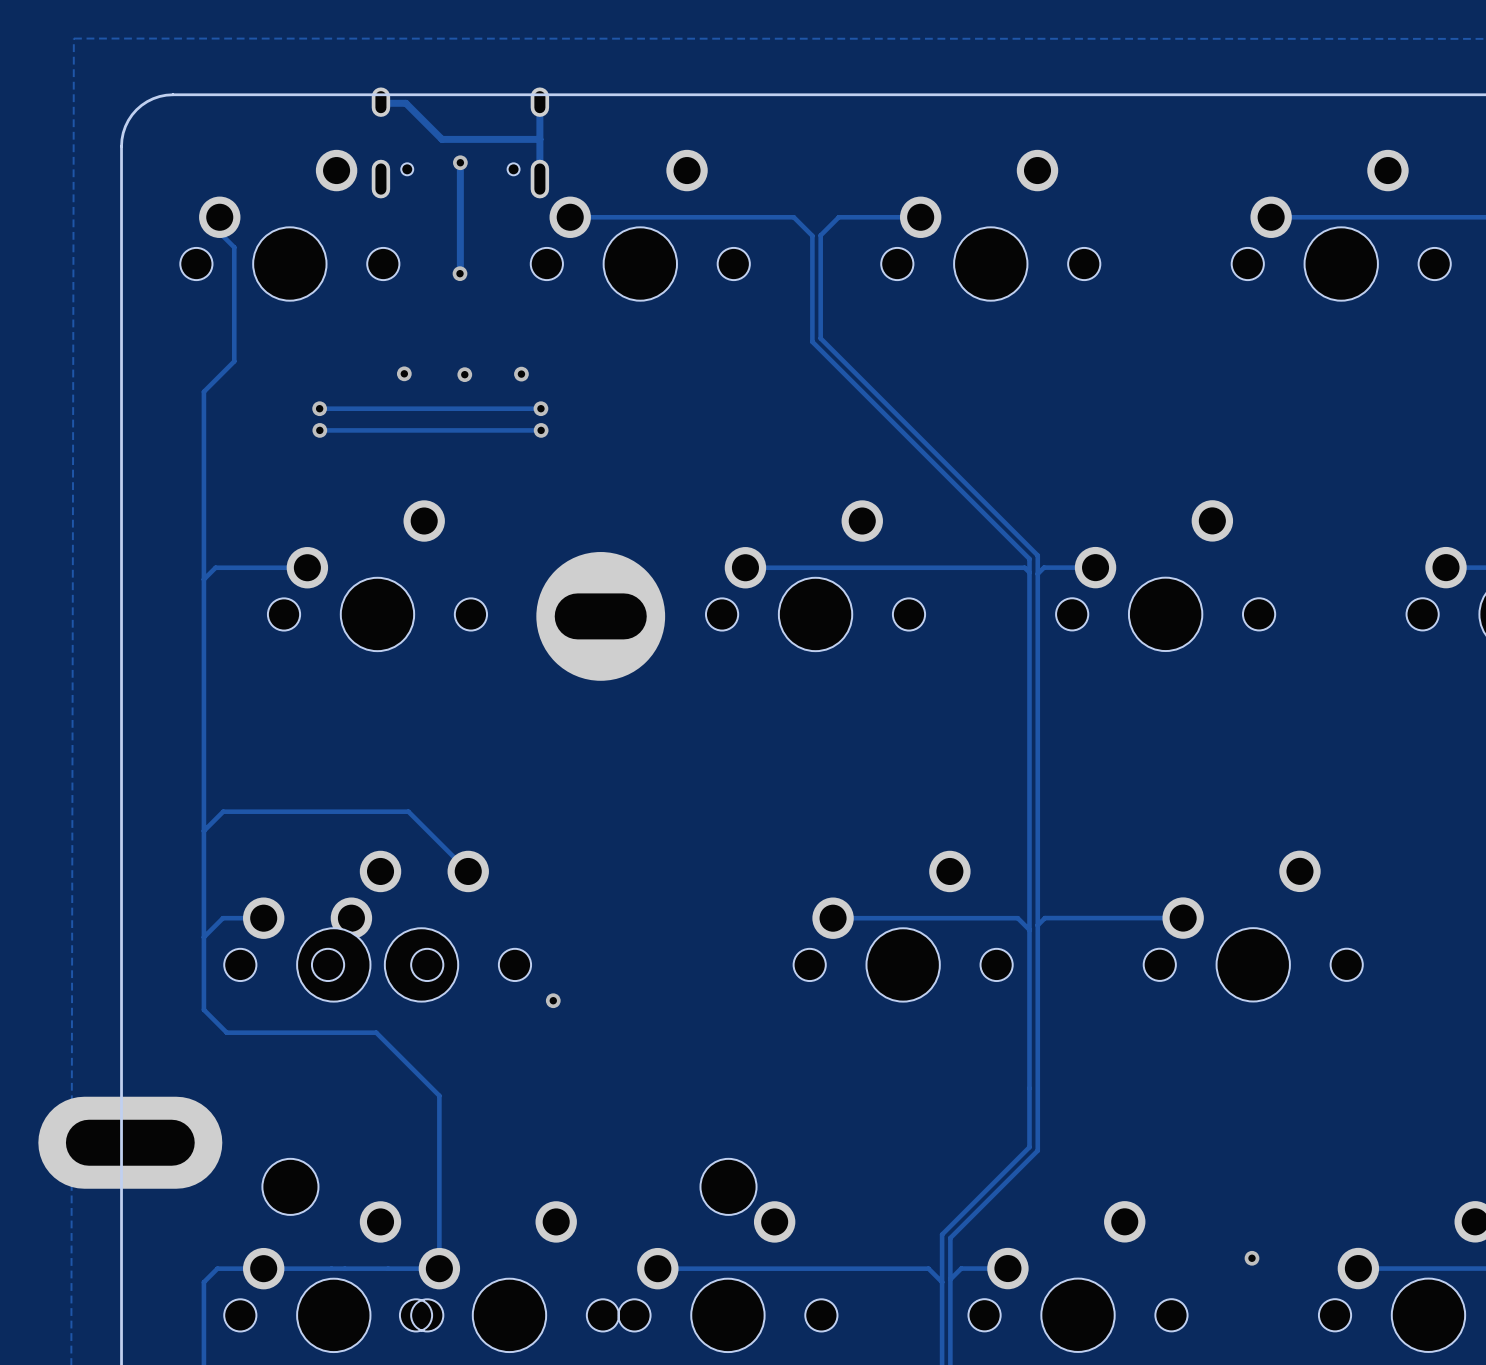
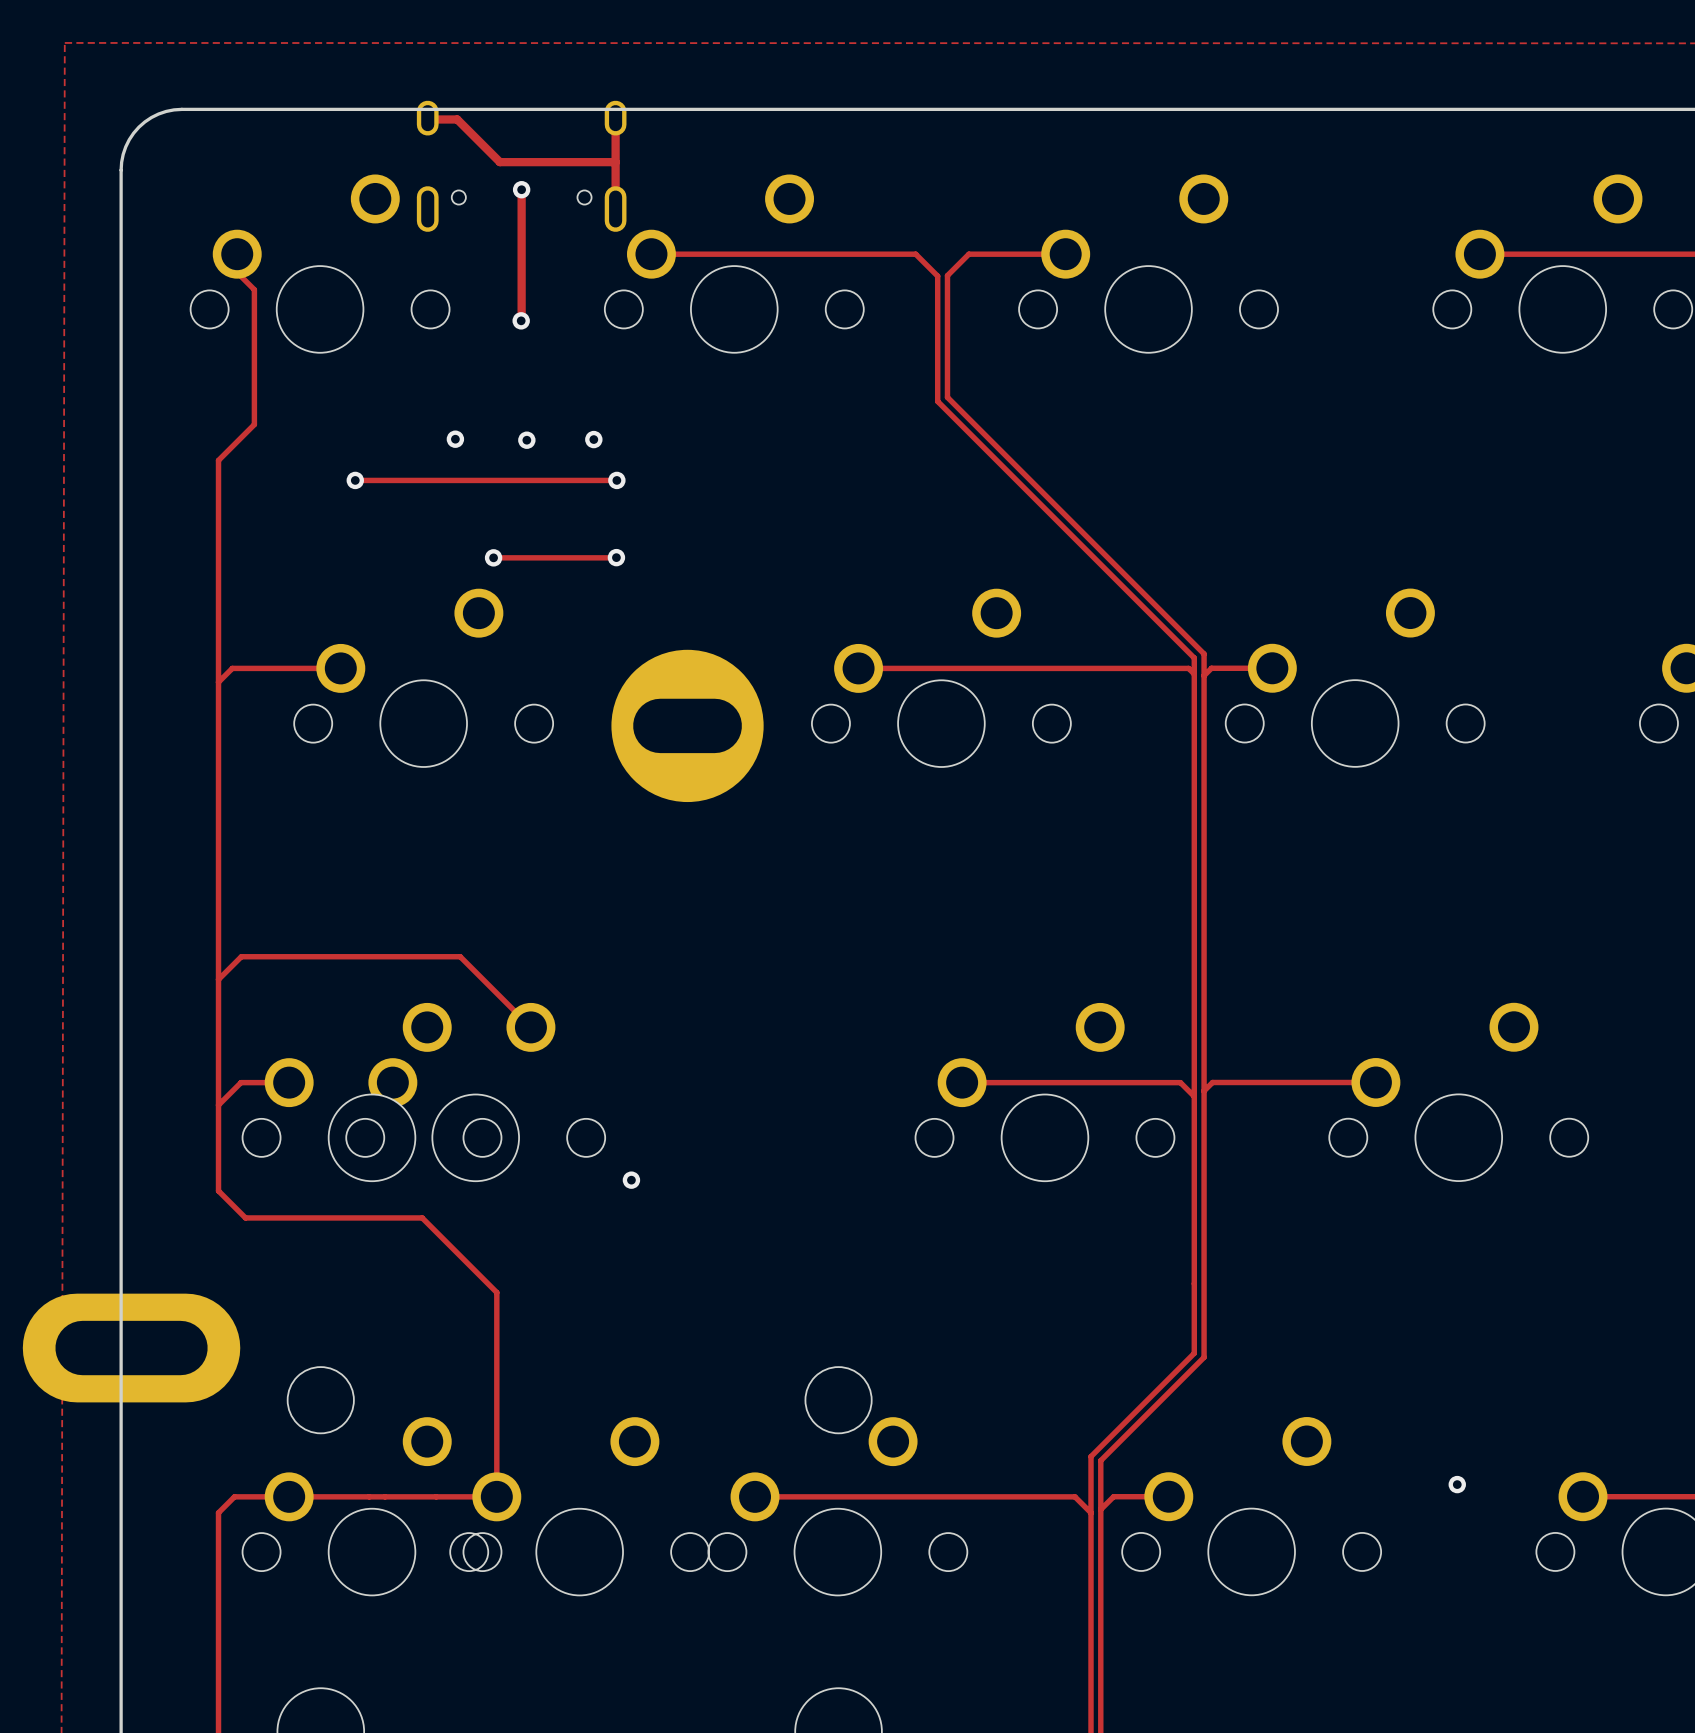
track: (319, 430) (541, 430) -> none
via: (319, 430) -> none
via position: (541, 430) -> (616, 557)
track: none -> (493, 557) (616, 557)
via: none -> (493, 557)

